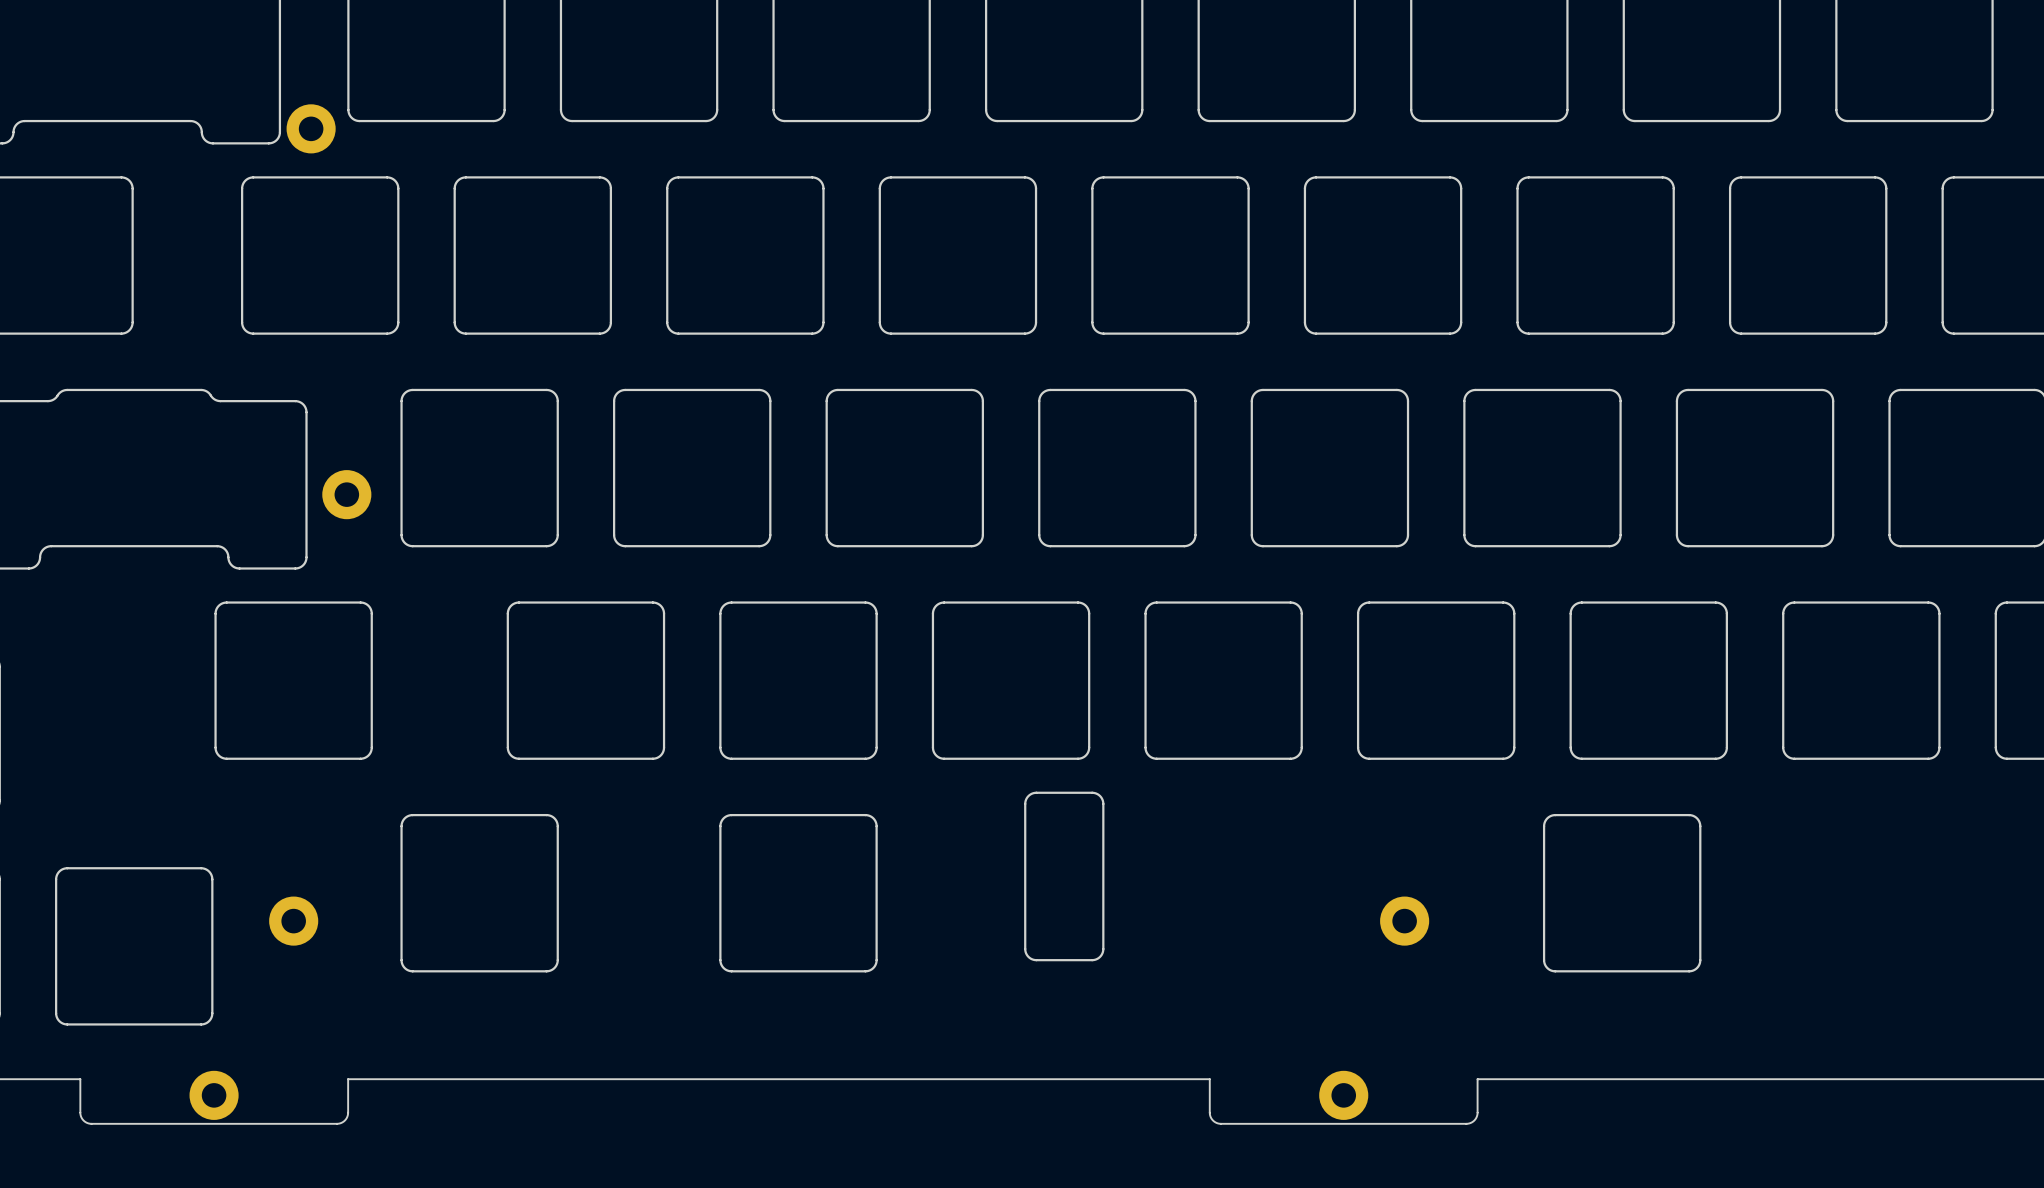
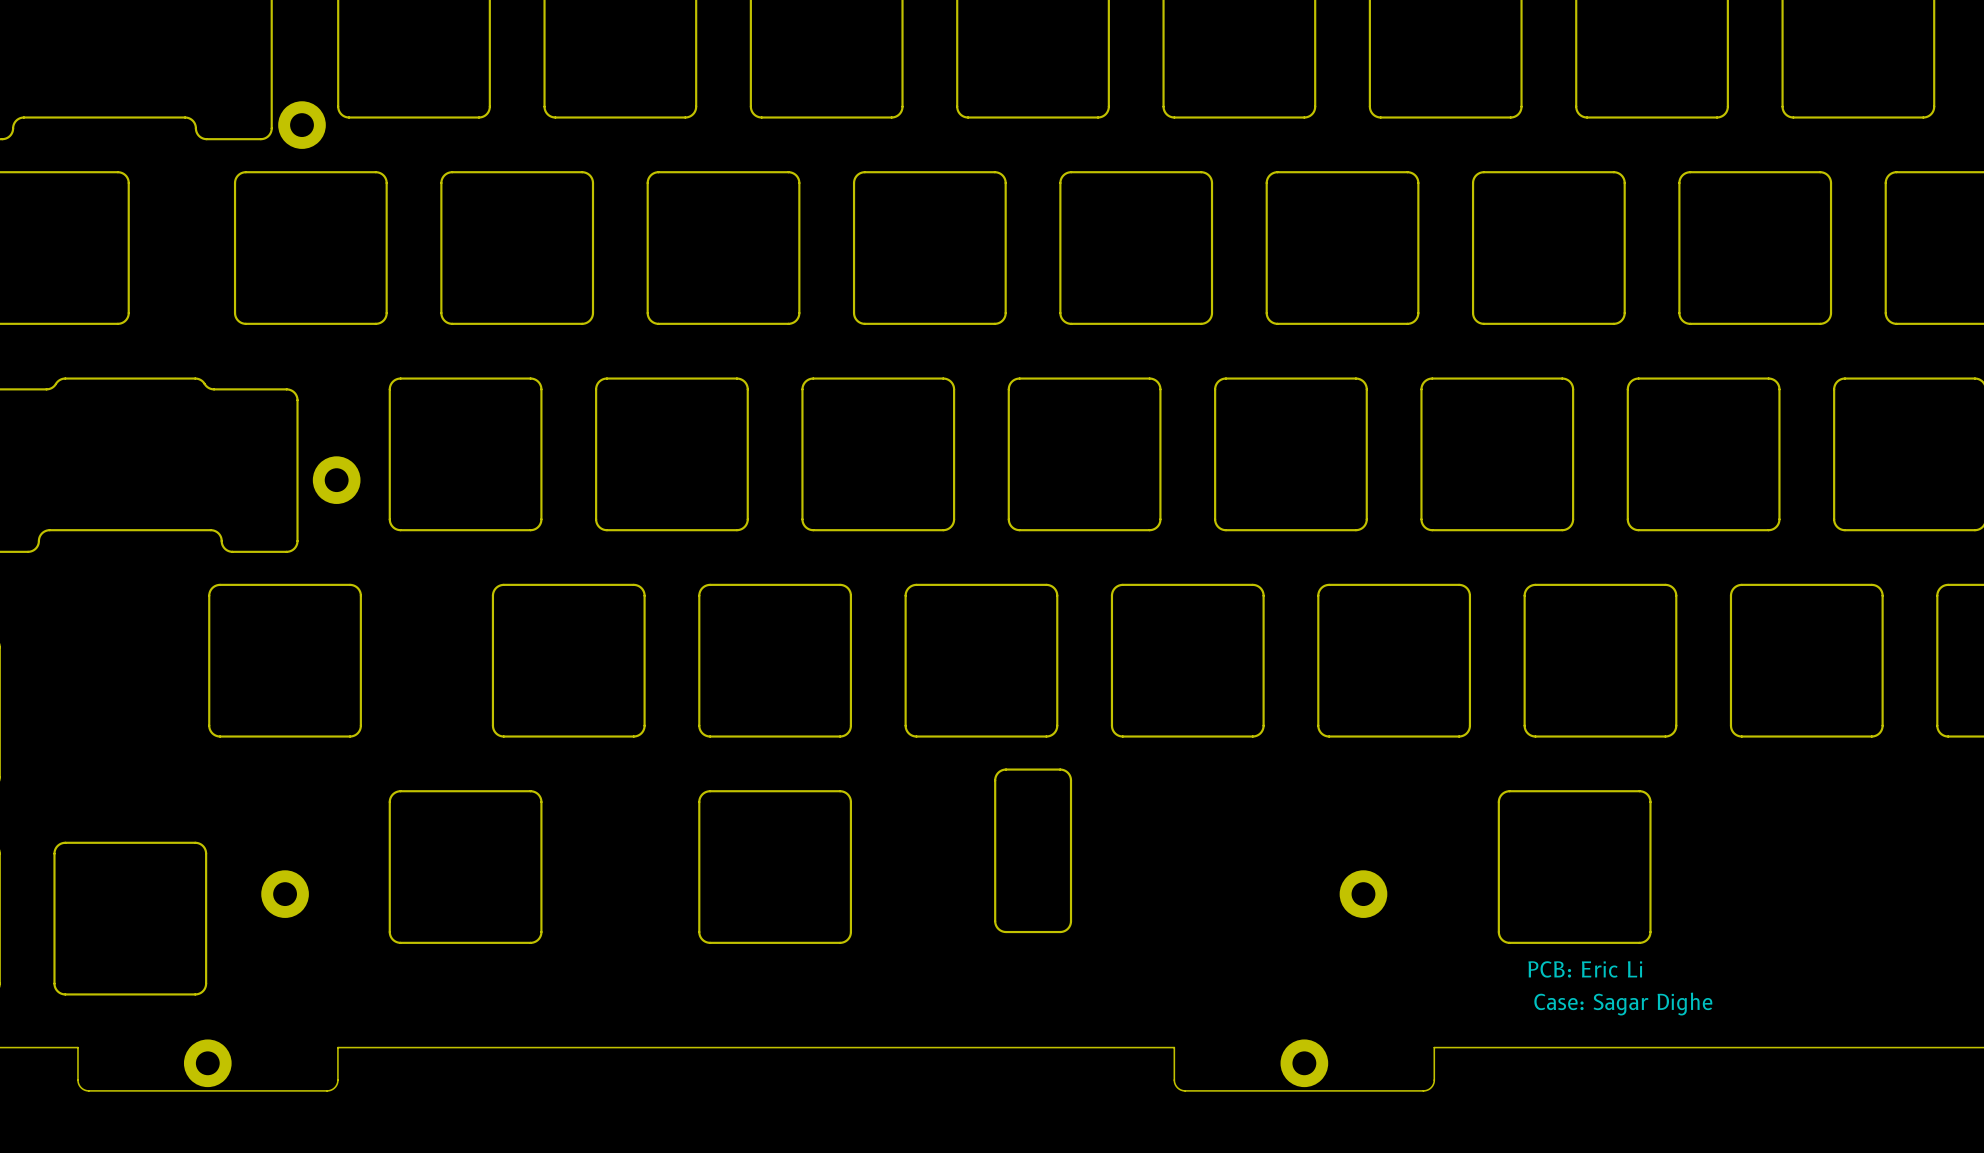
text: none -> PCB: Eric Li (1585, 969)
text: none -> Case: Sagar Dighe (1623, 1004)

